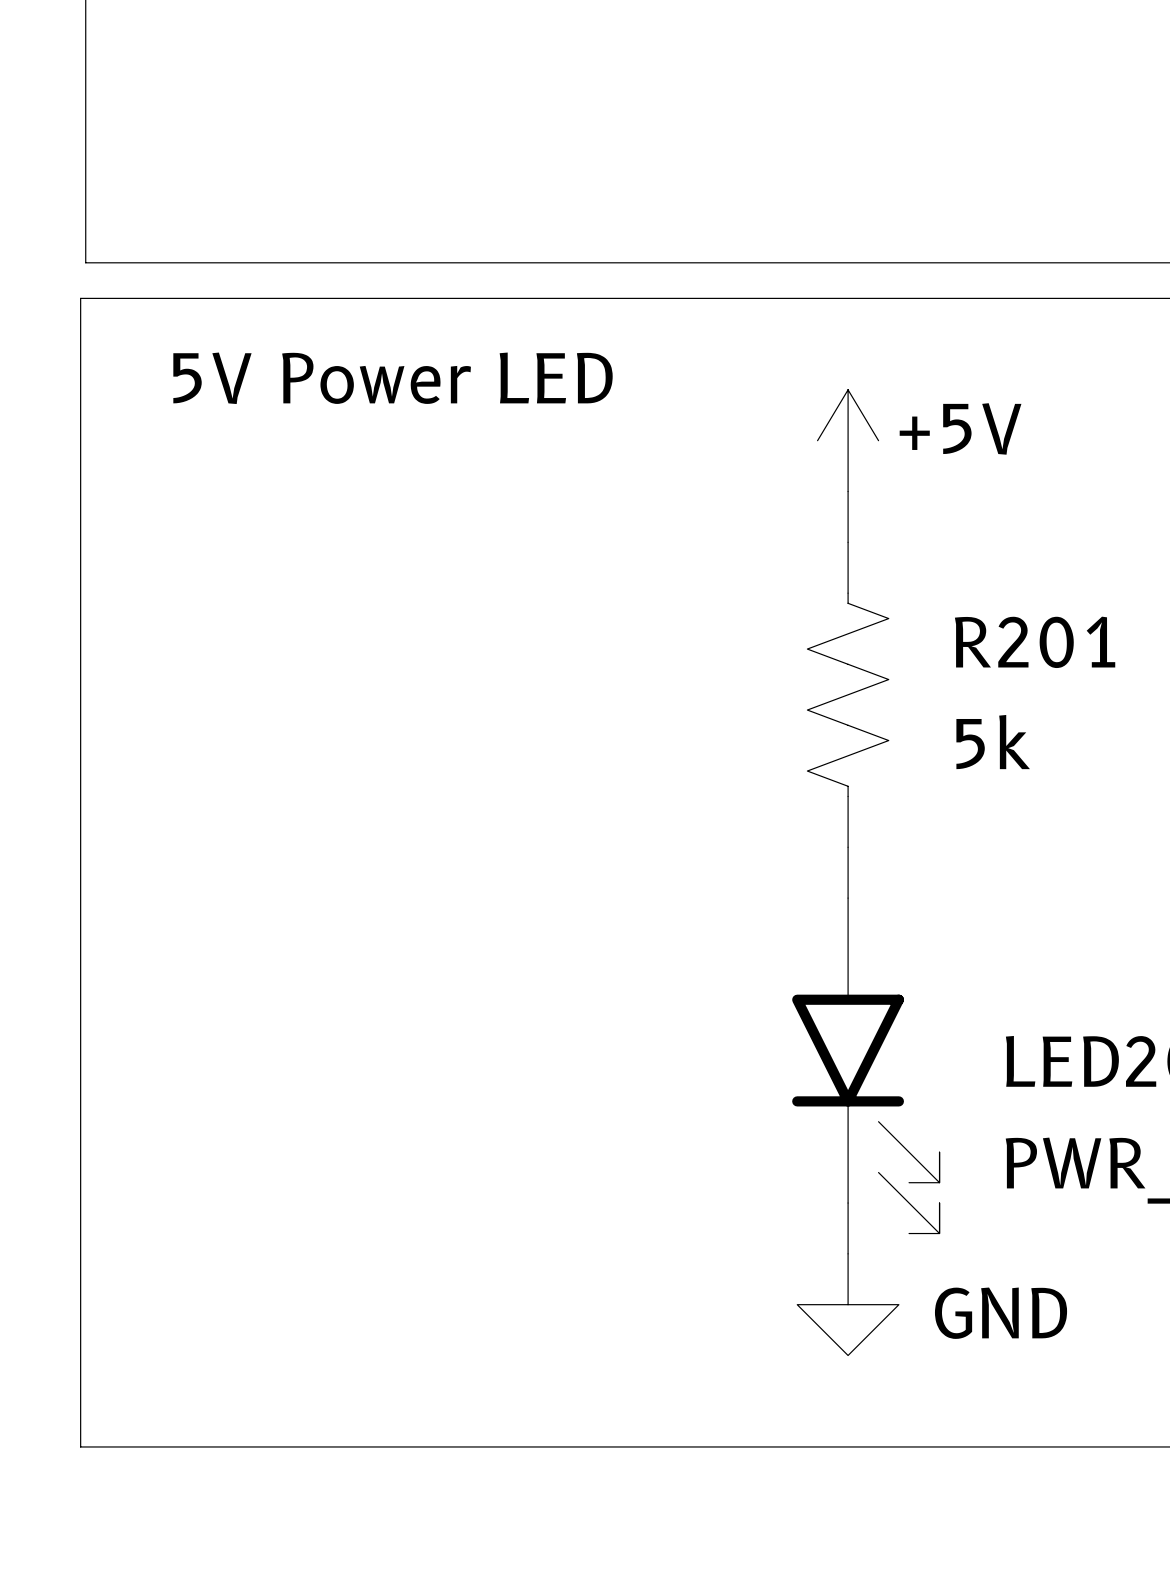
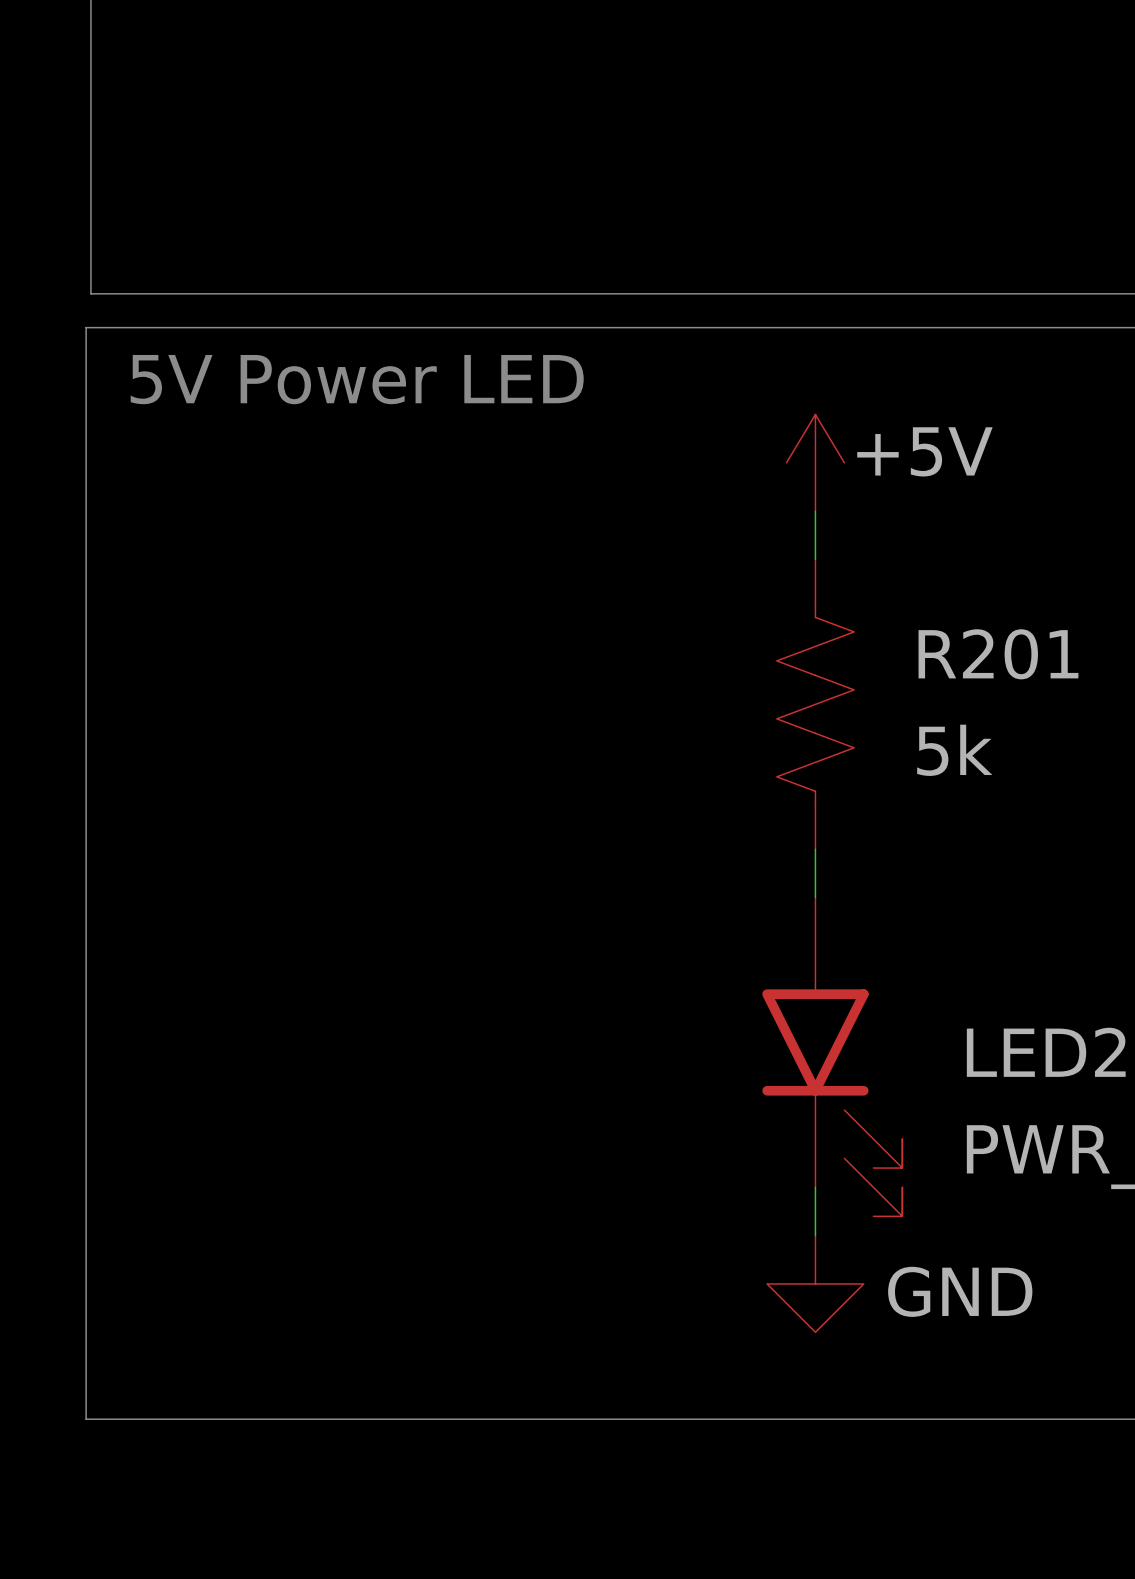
text position: 5V Power LED (393, 378) -> 5V Power LED (357, 379)

